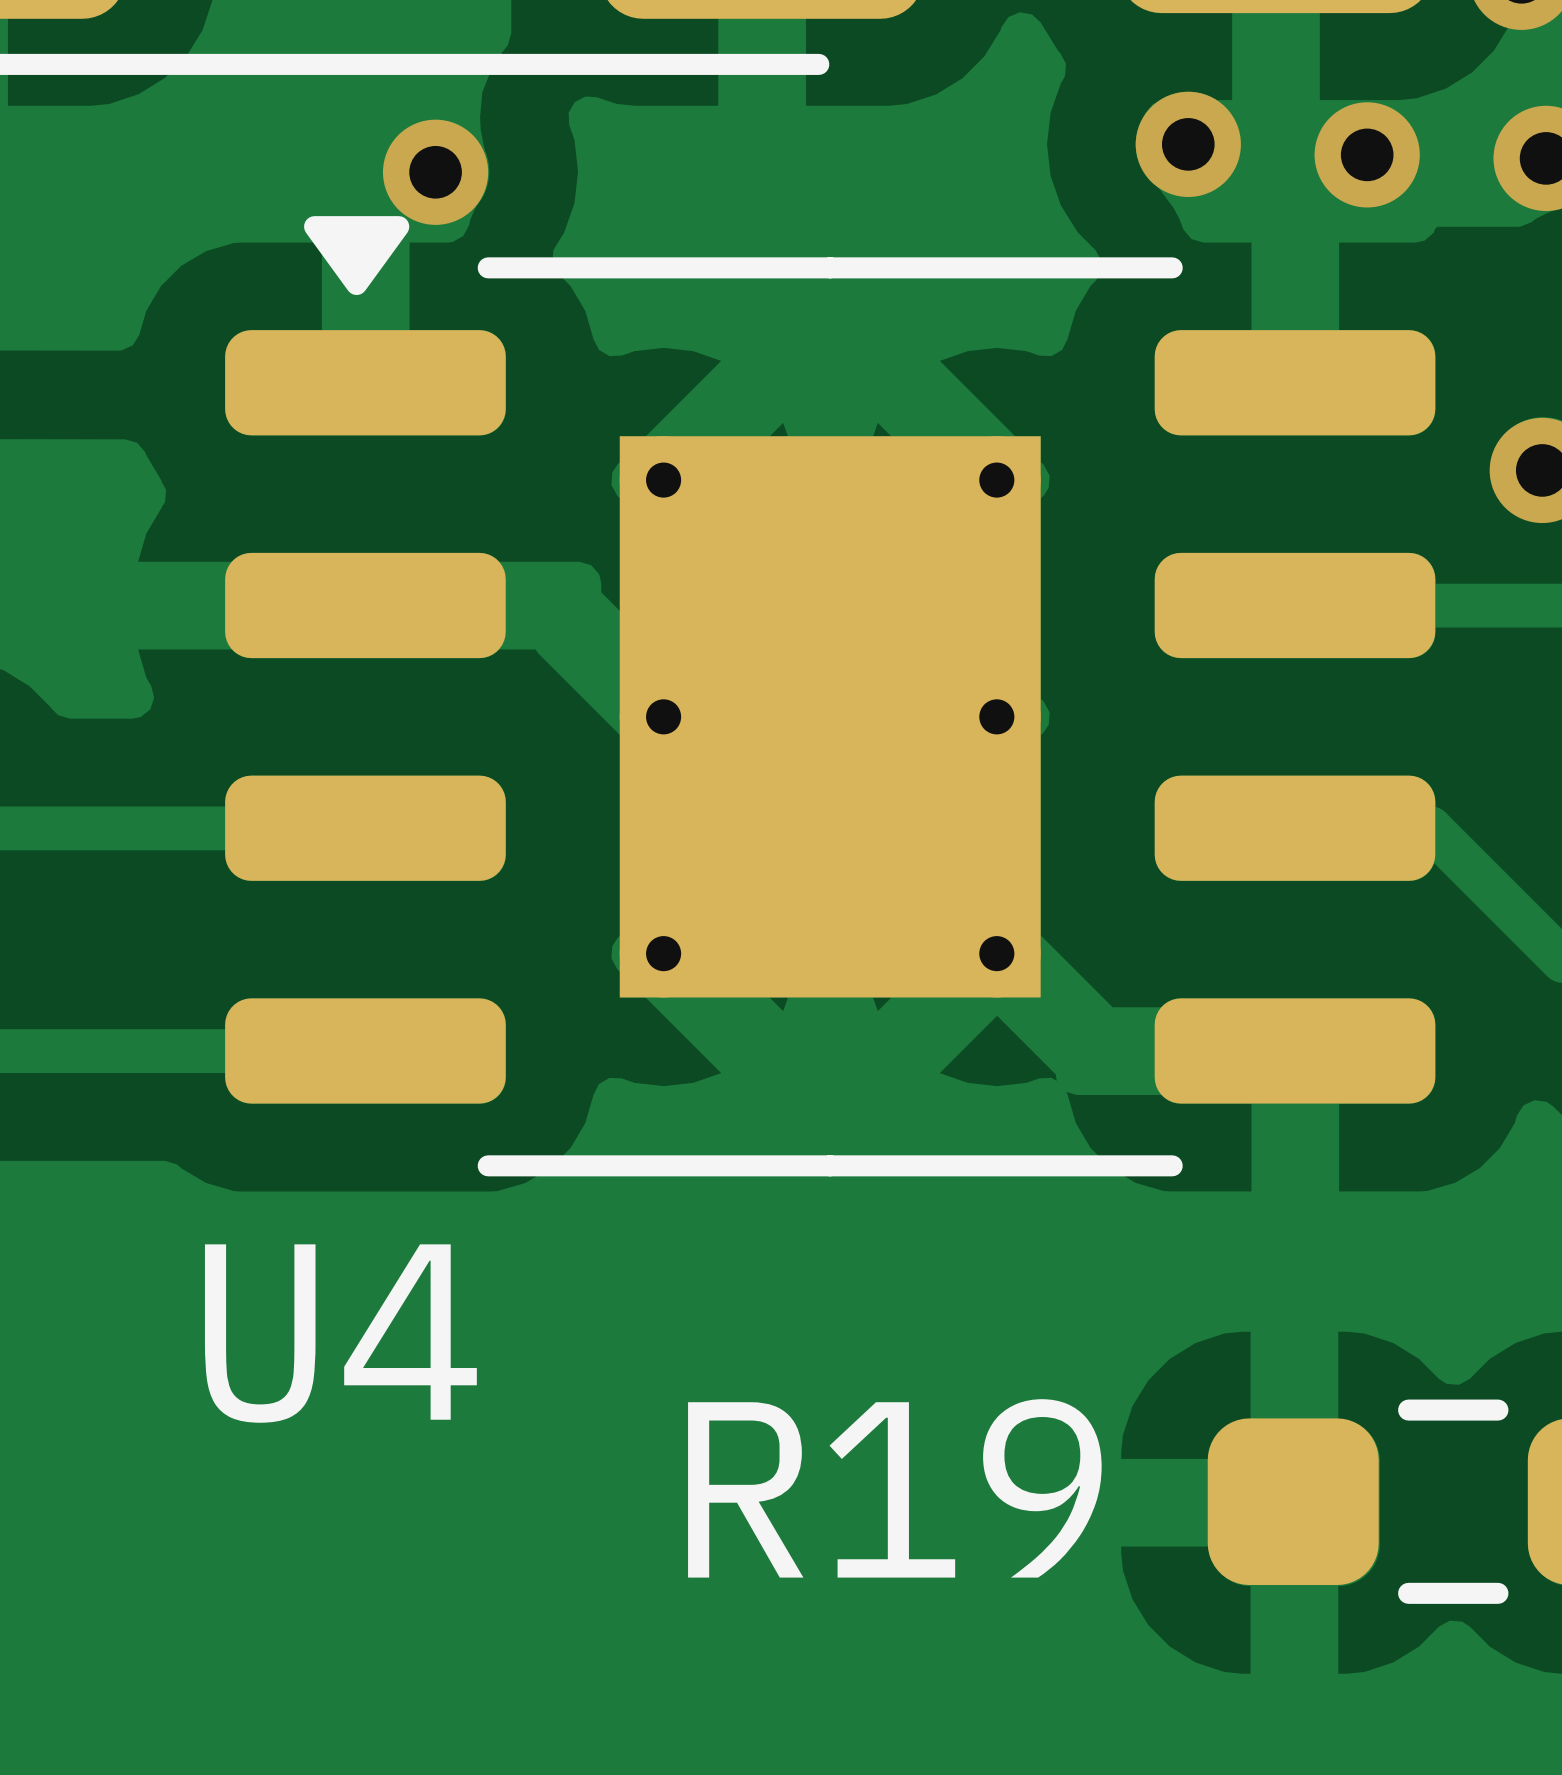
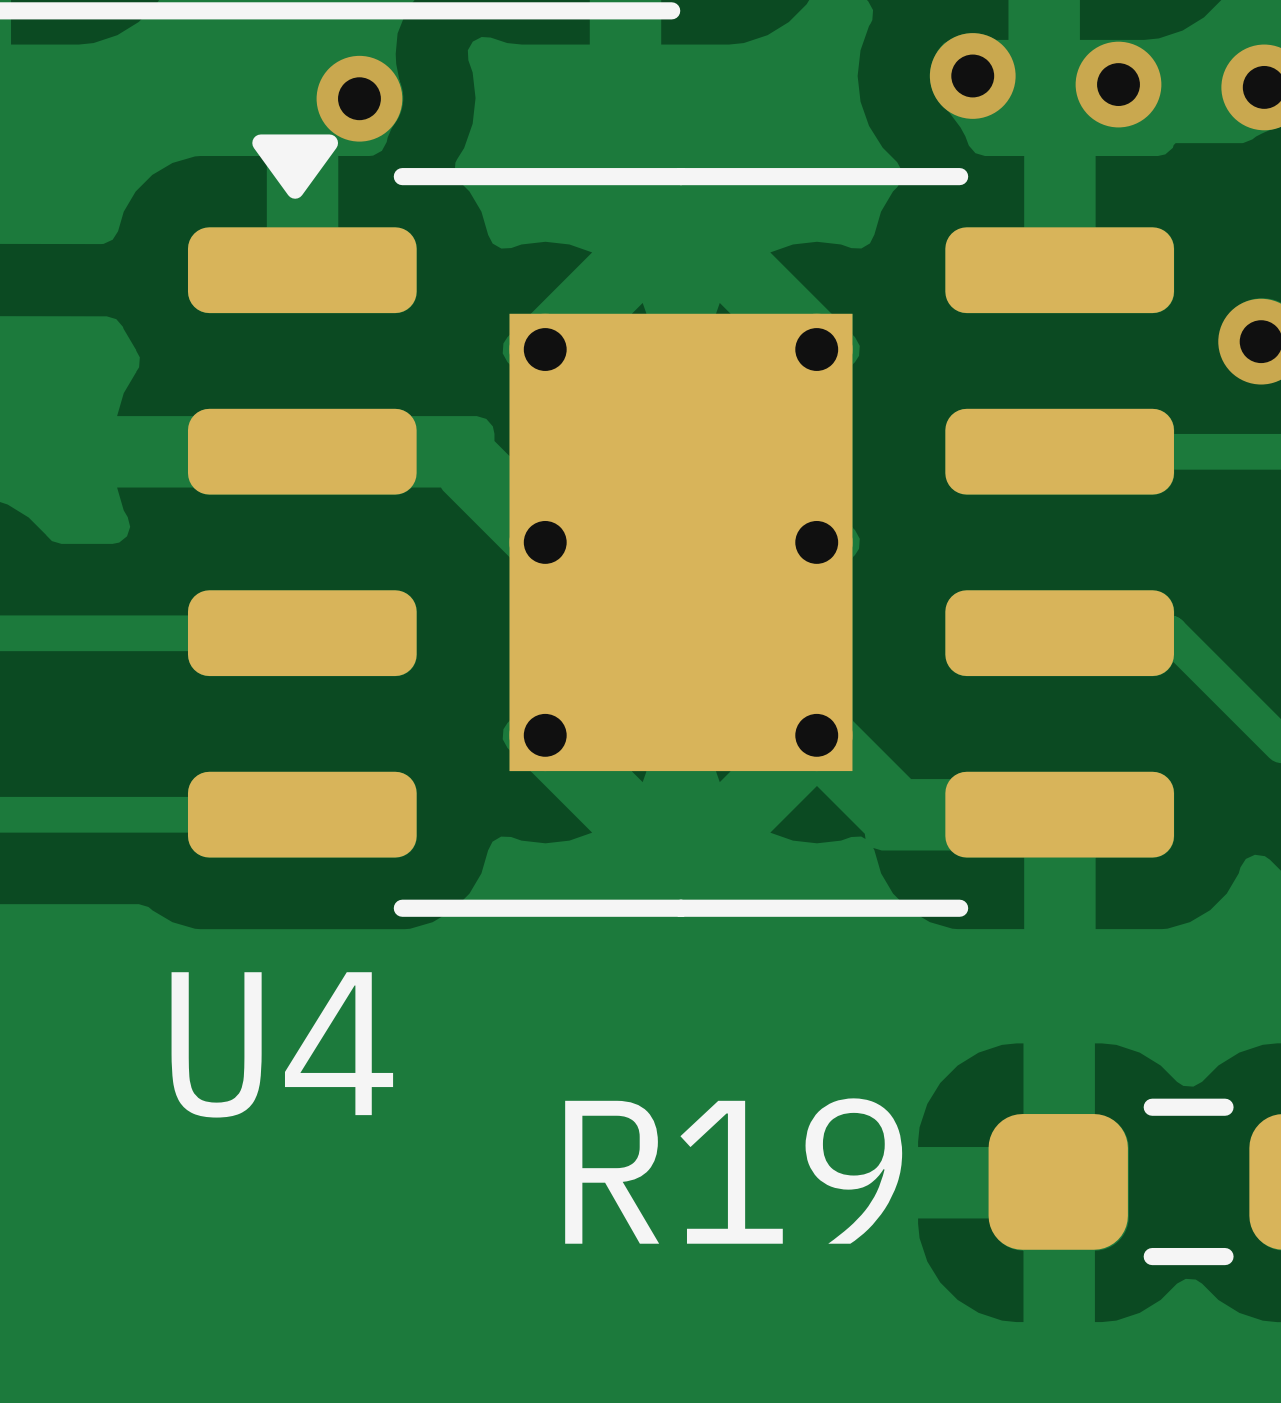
U4 footprint: [225, 216, 1436, 1177] -> [187, 134, 1174, 917]

